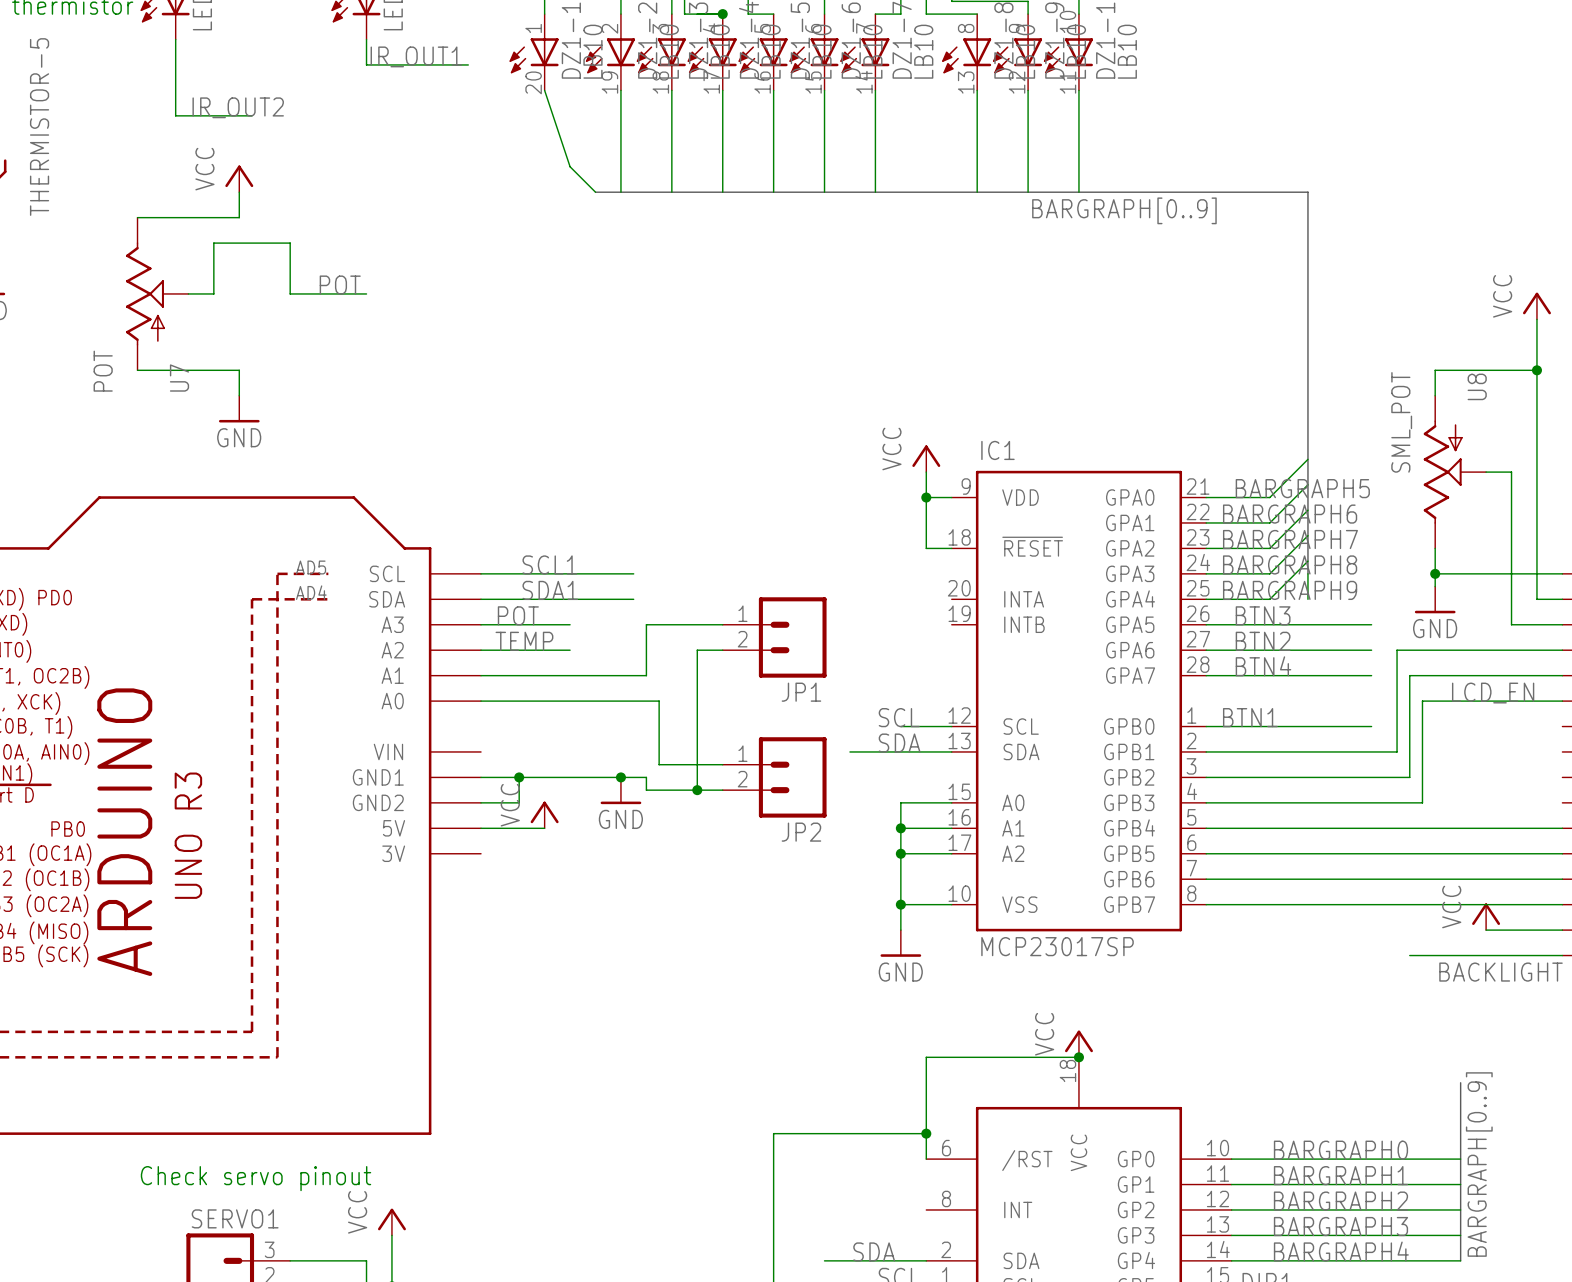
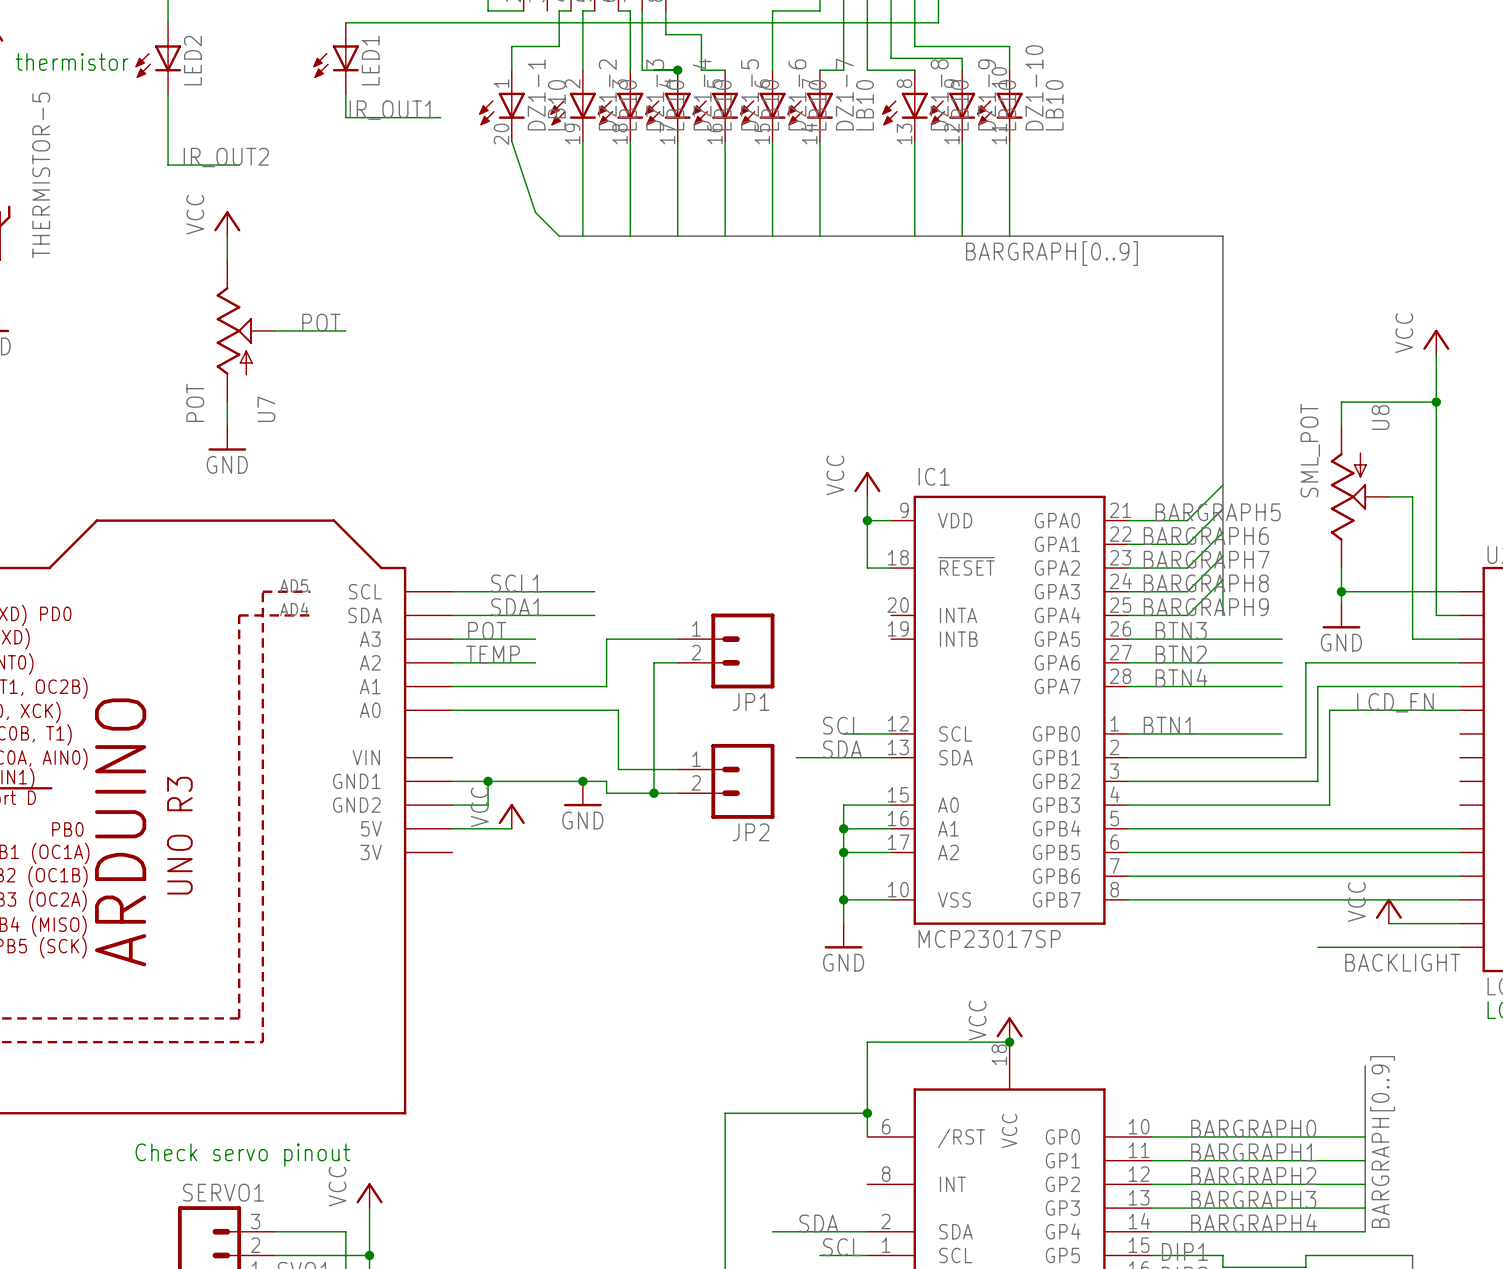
wire: (137, 217) (239, 217) -> none
U7 position: (157, 293) -> (245, 330)
wire: (188, 293) (213, 293) (213, 243) (290, 243) (290, 293) -> none
wire: (137, 370) (239, 370) -> none

